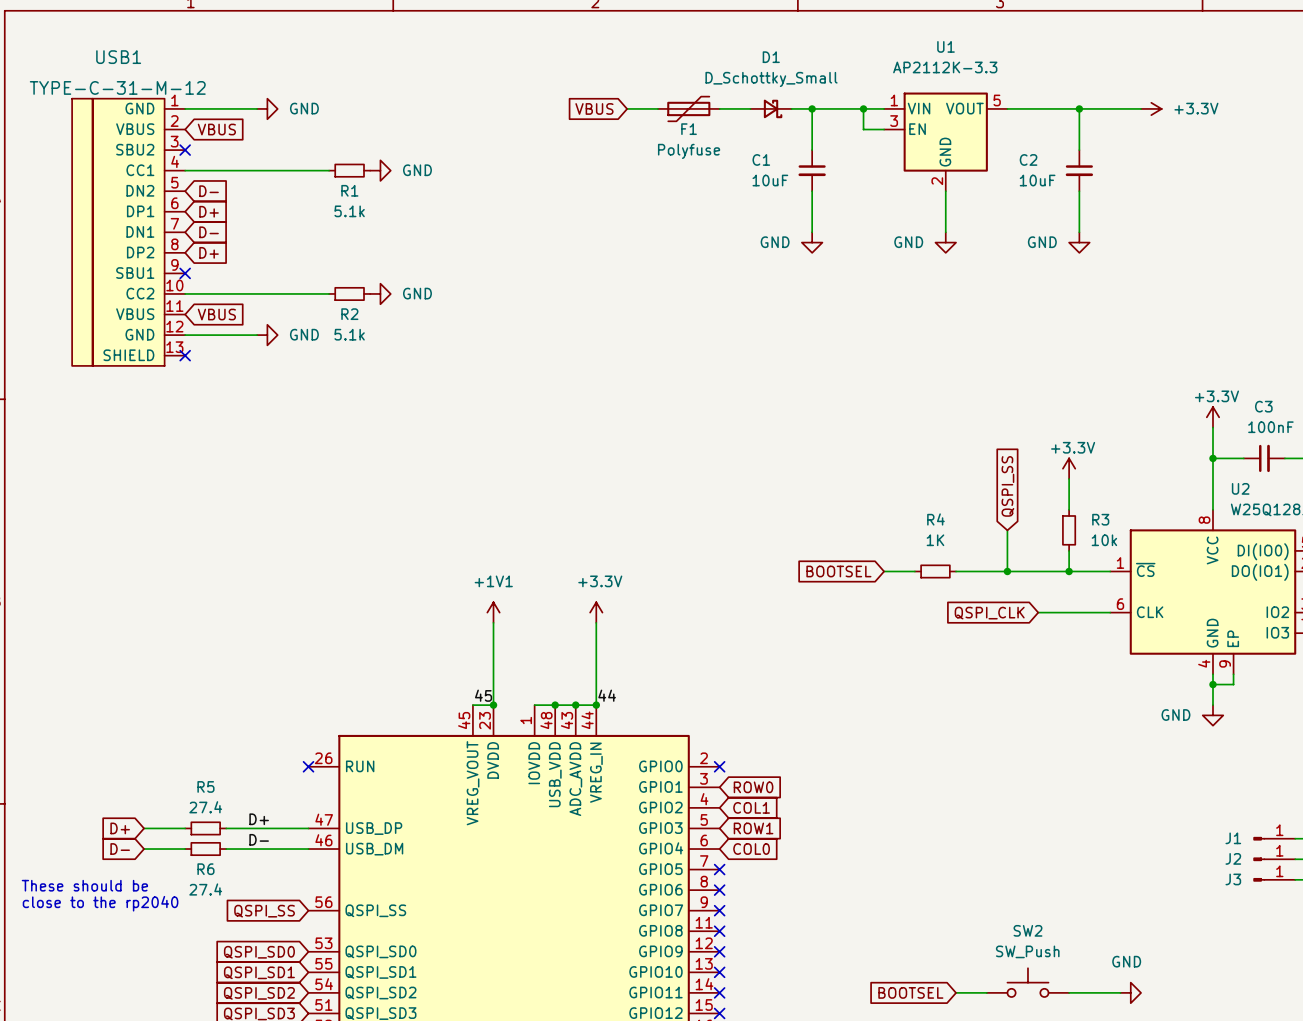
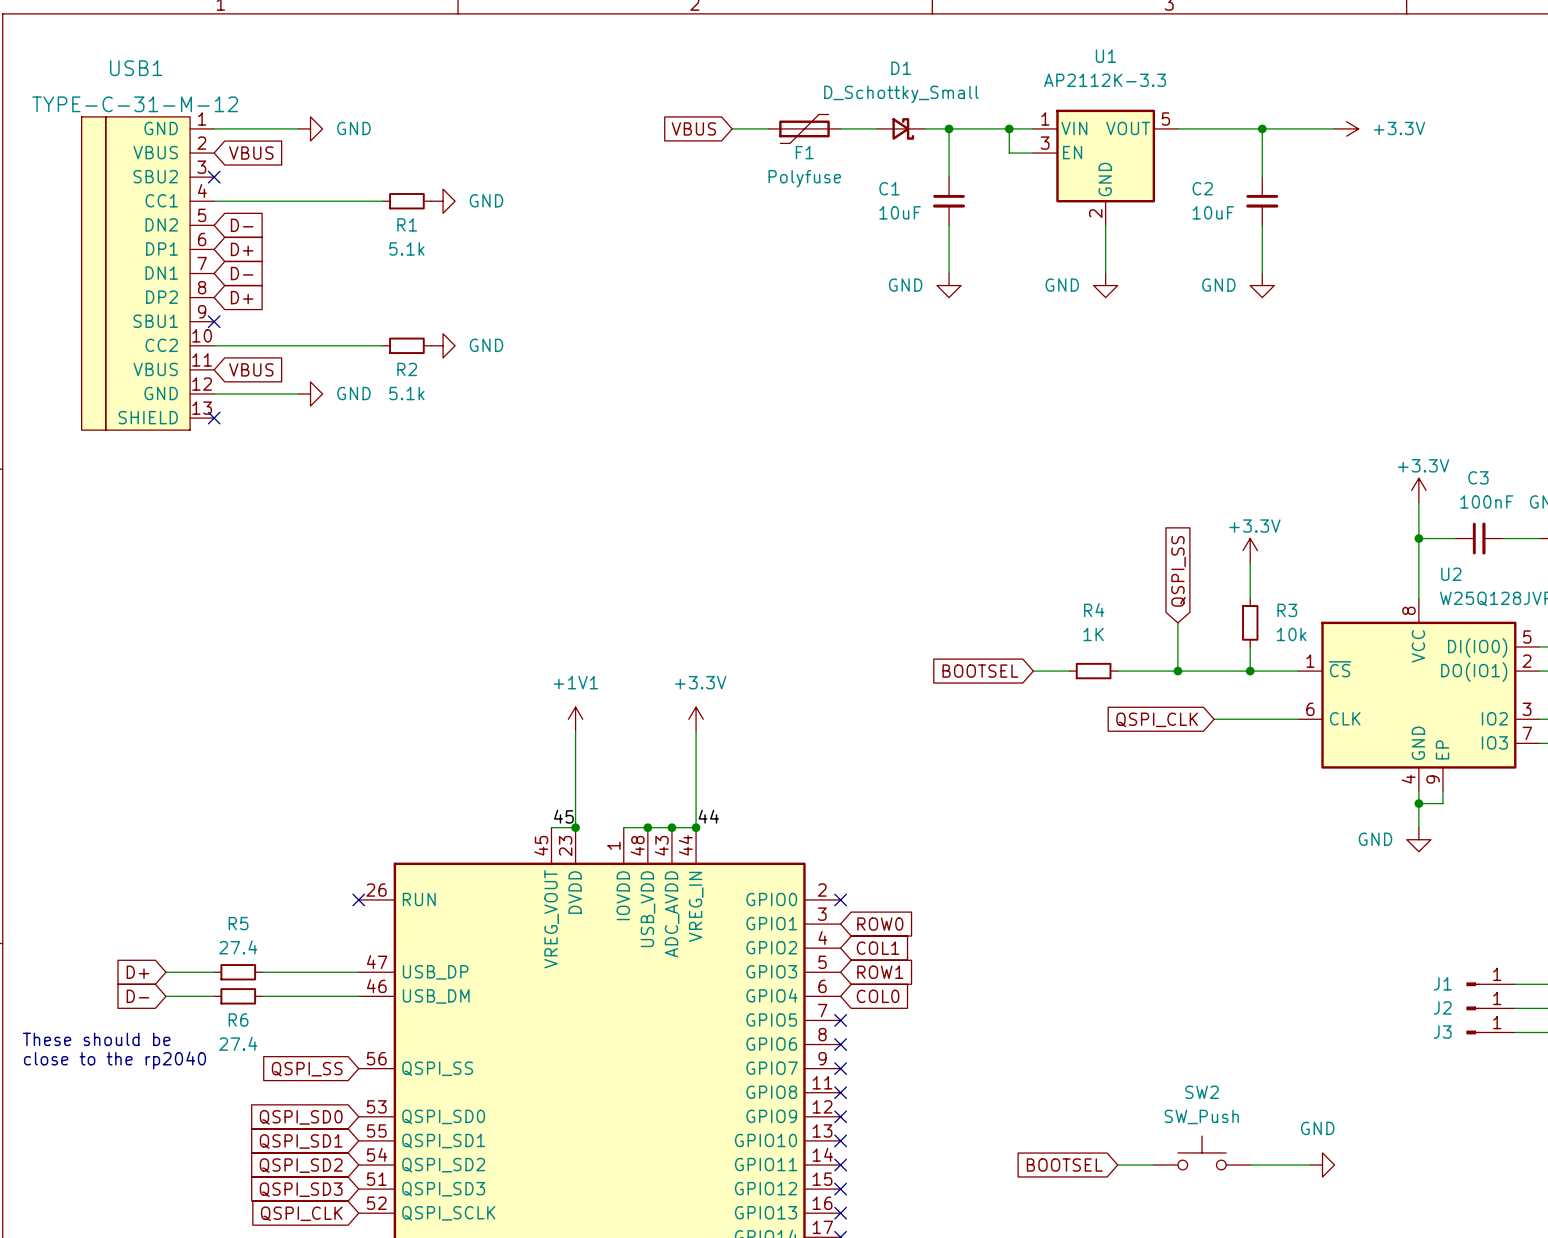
label: D+ (259, 819) -> none
label: D- (259, 839) -> none

